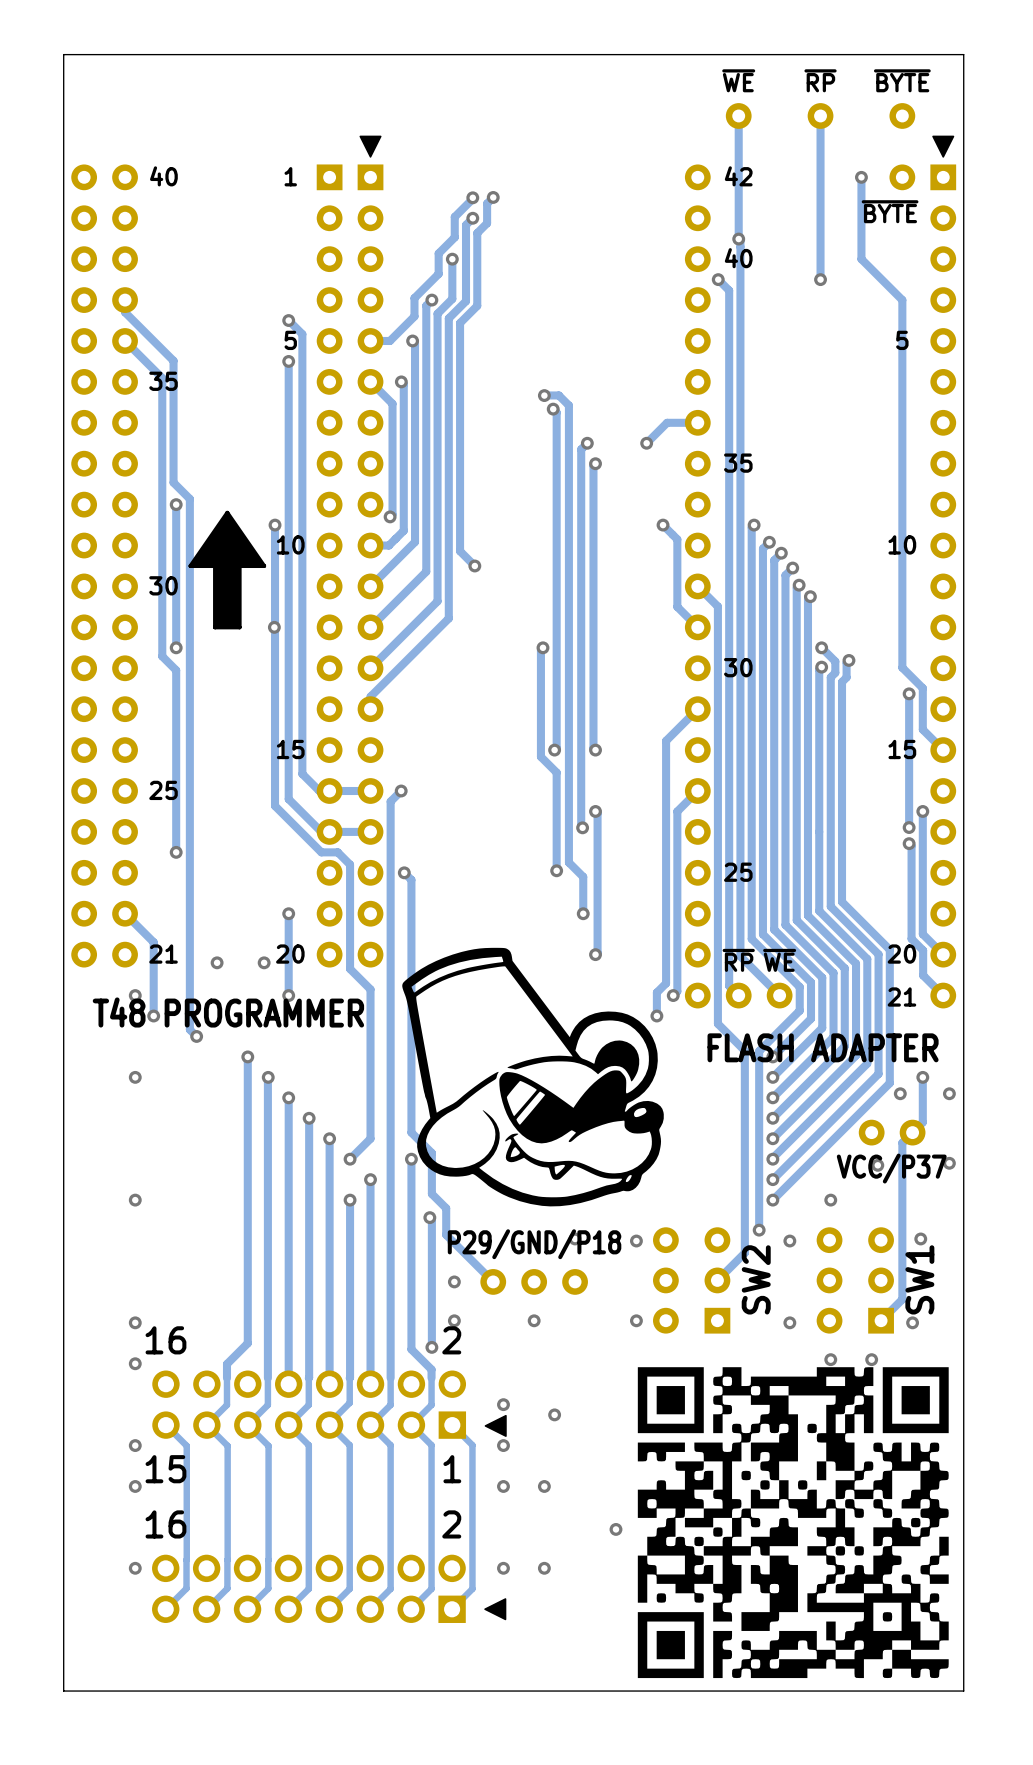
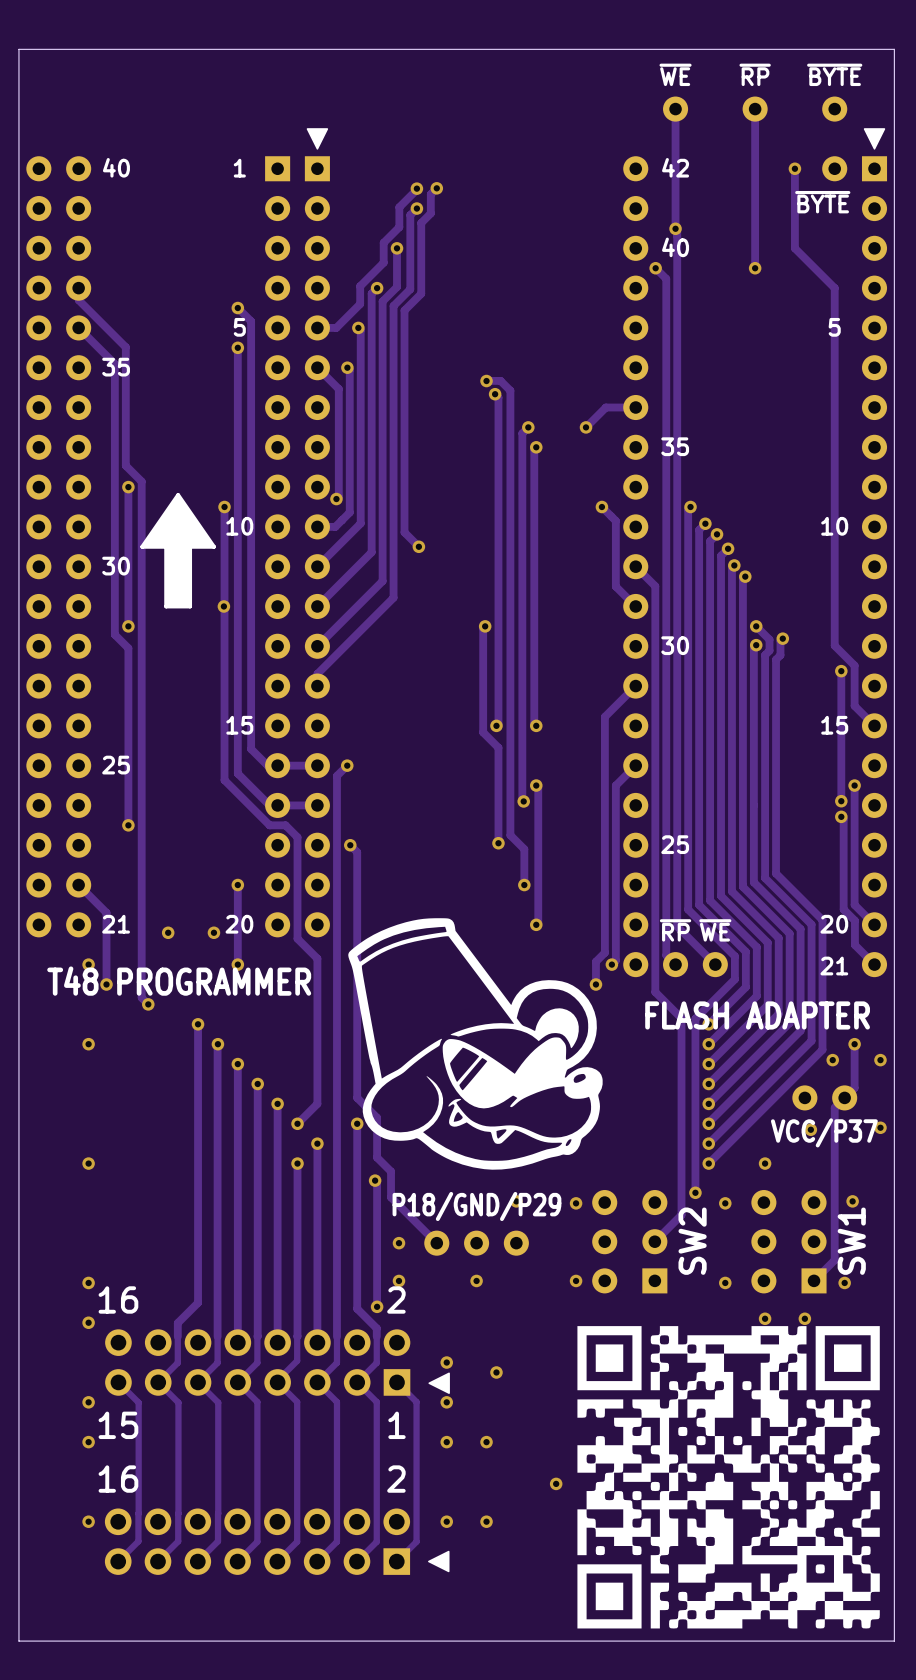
text: P29/GND/P18 (534, 1244) -> P18/GND/P29 (476, 1206)

